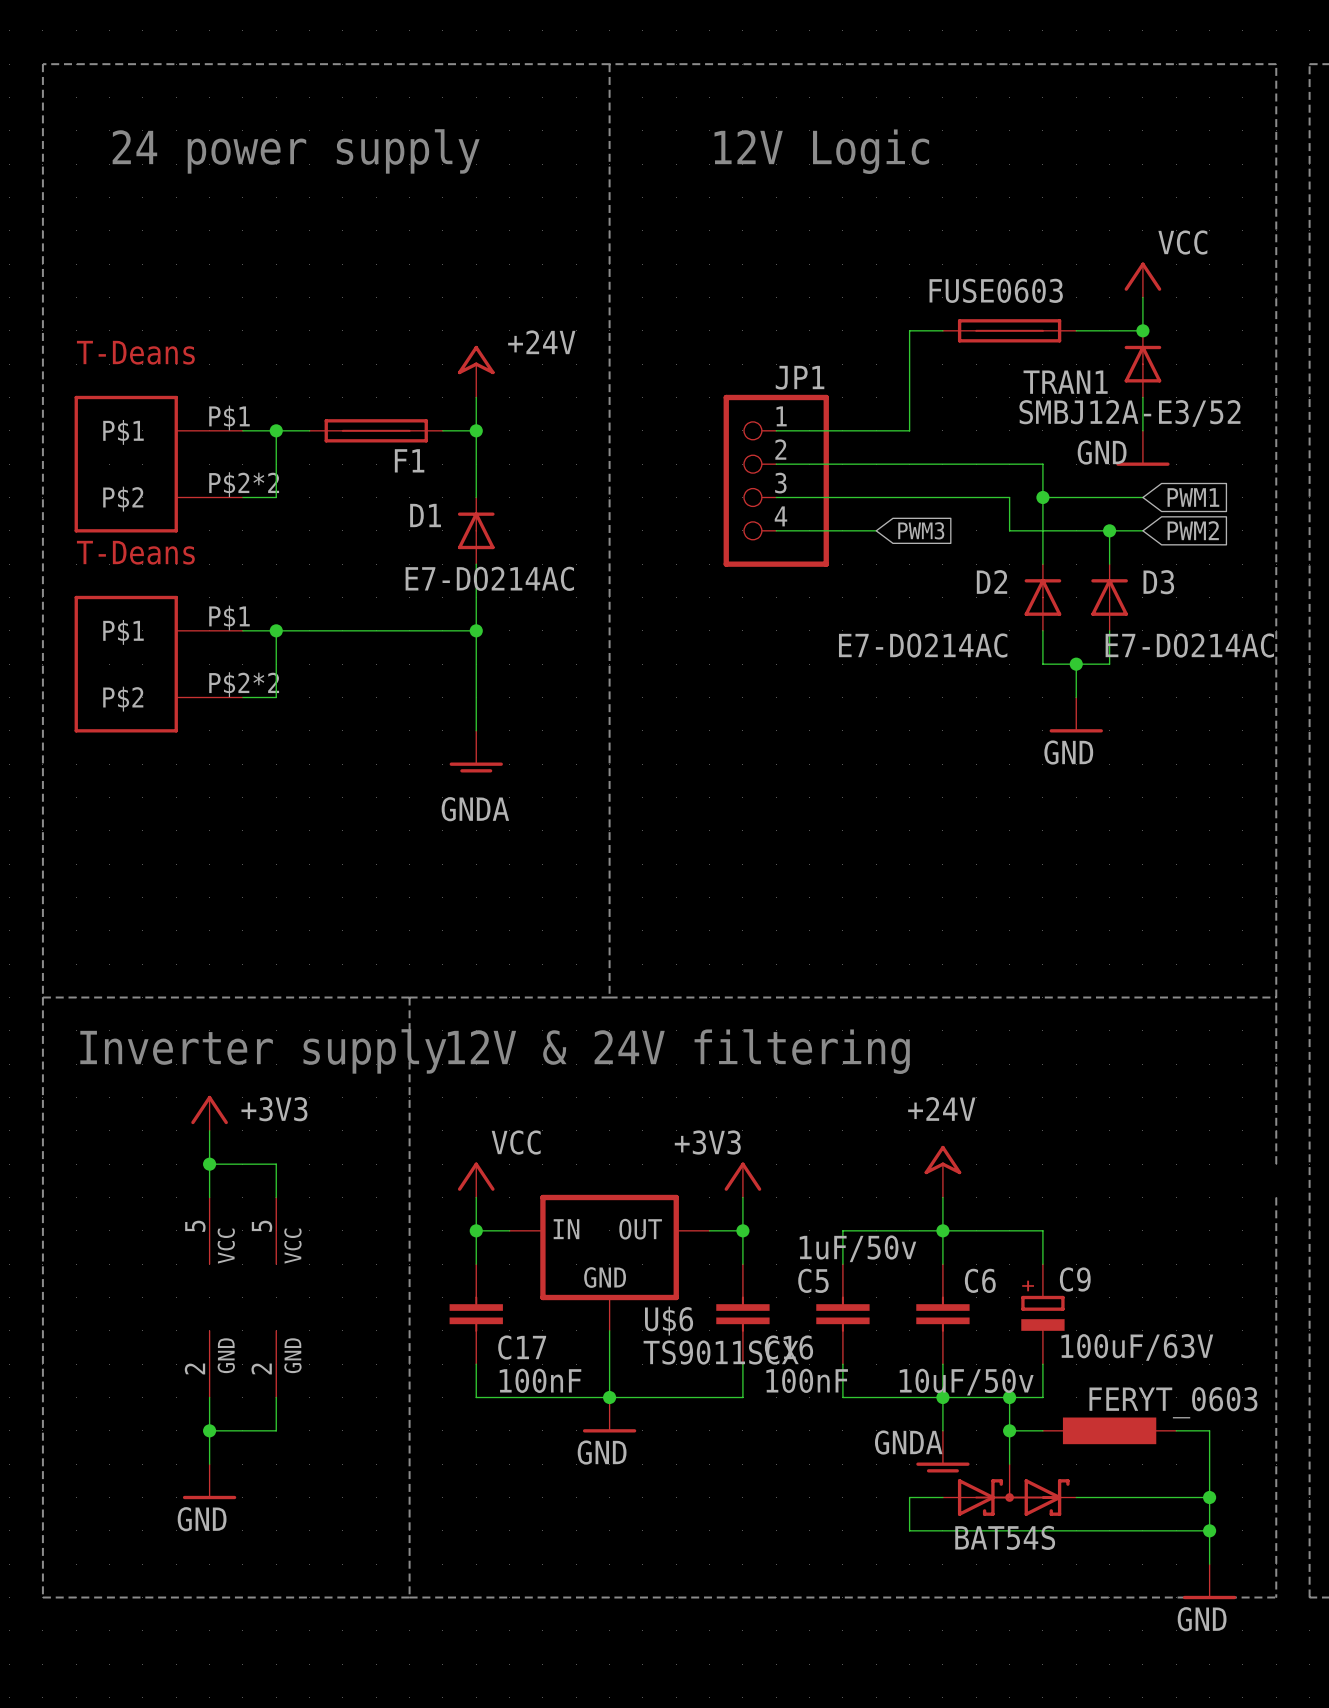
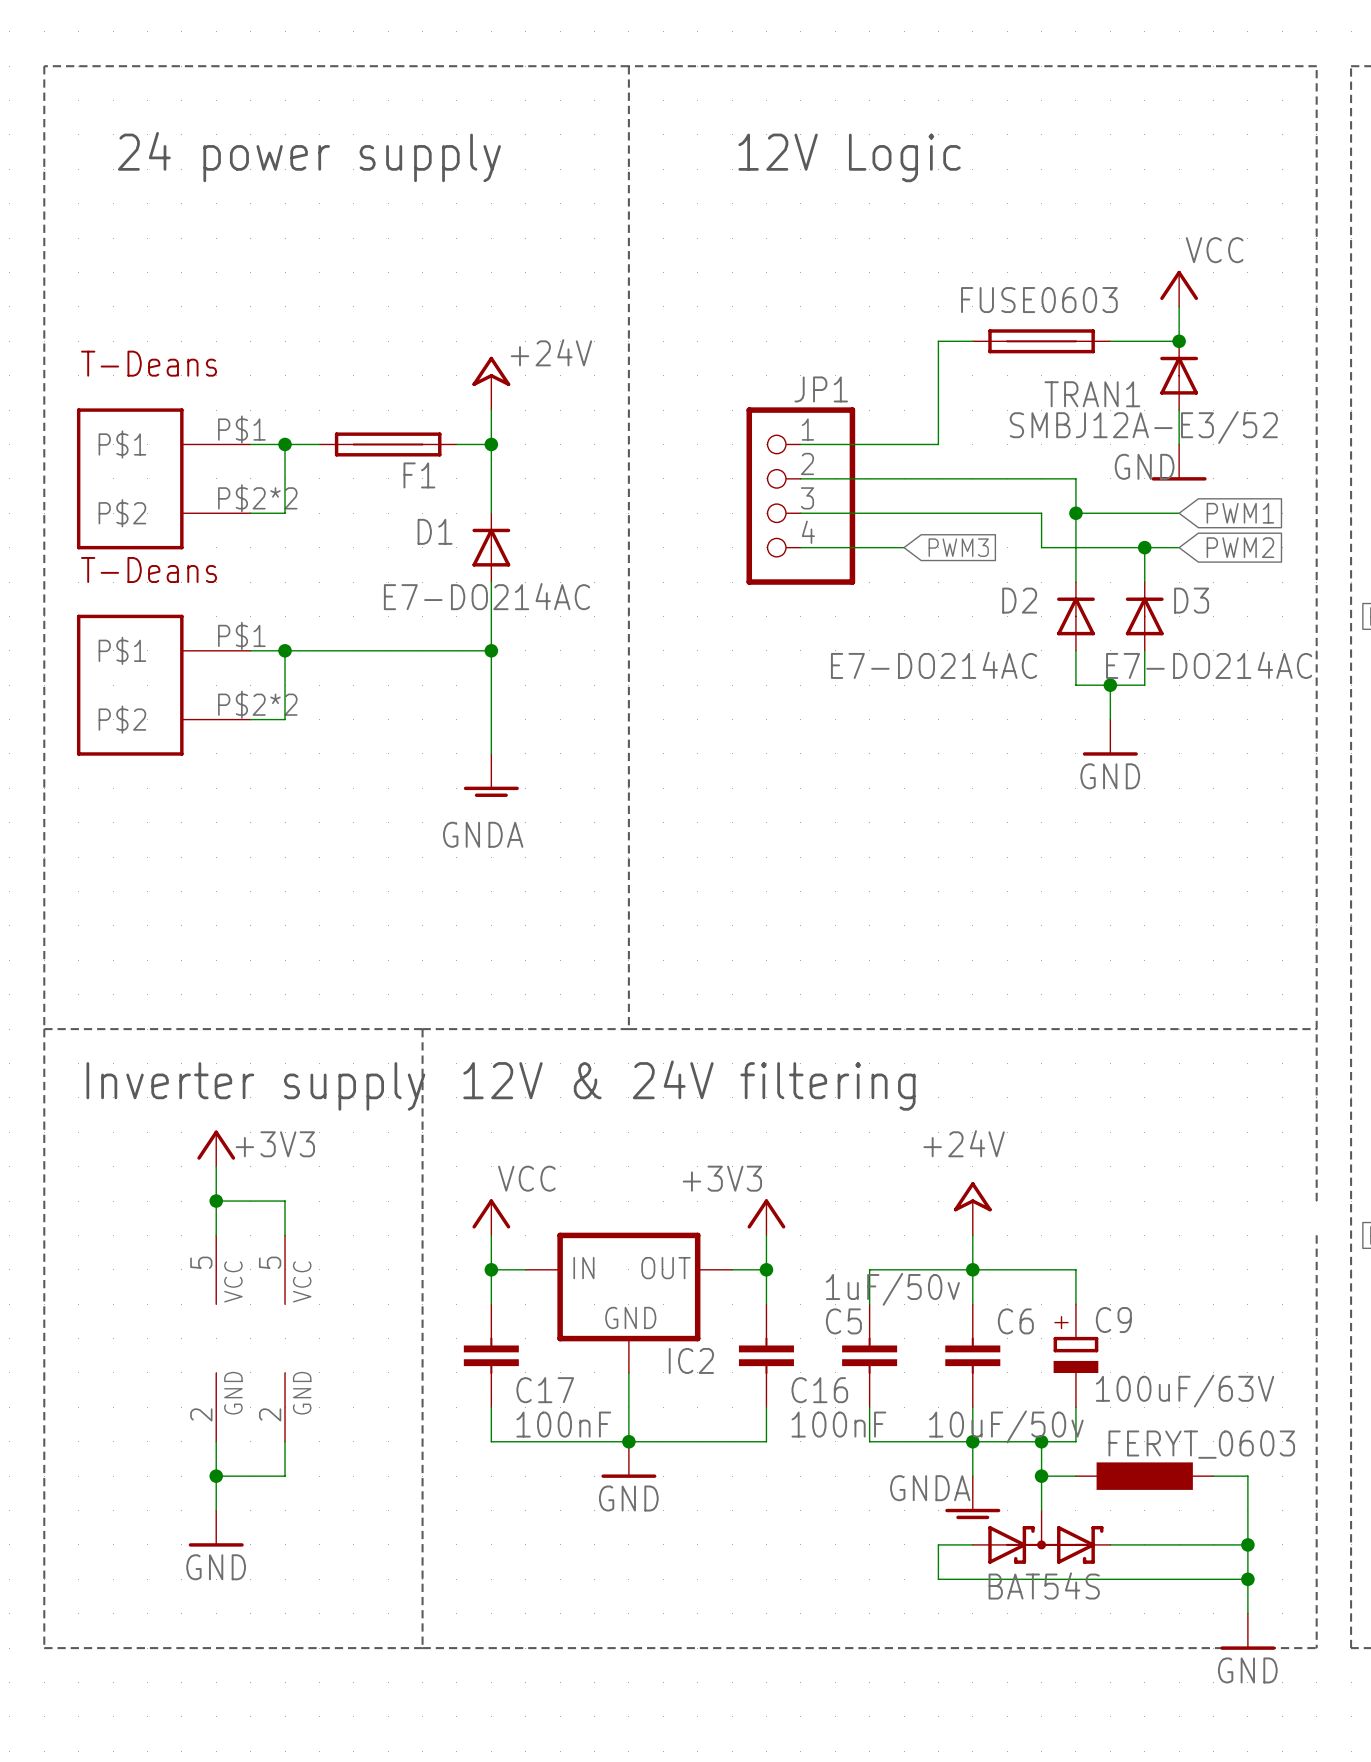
U$6 name: U$6 (669, 1321) -> IC2 (691, 1360)
U$6 value: TS9011SCX (721, 1352) -> none

